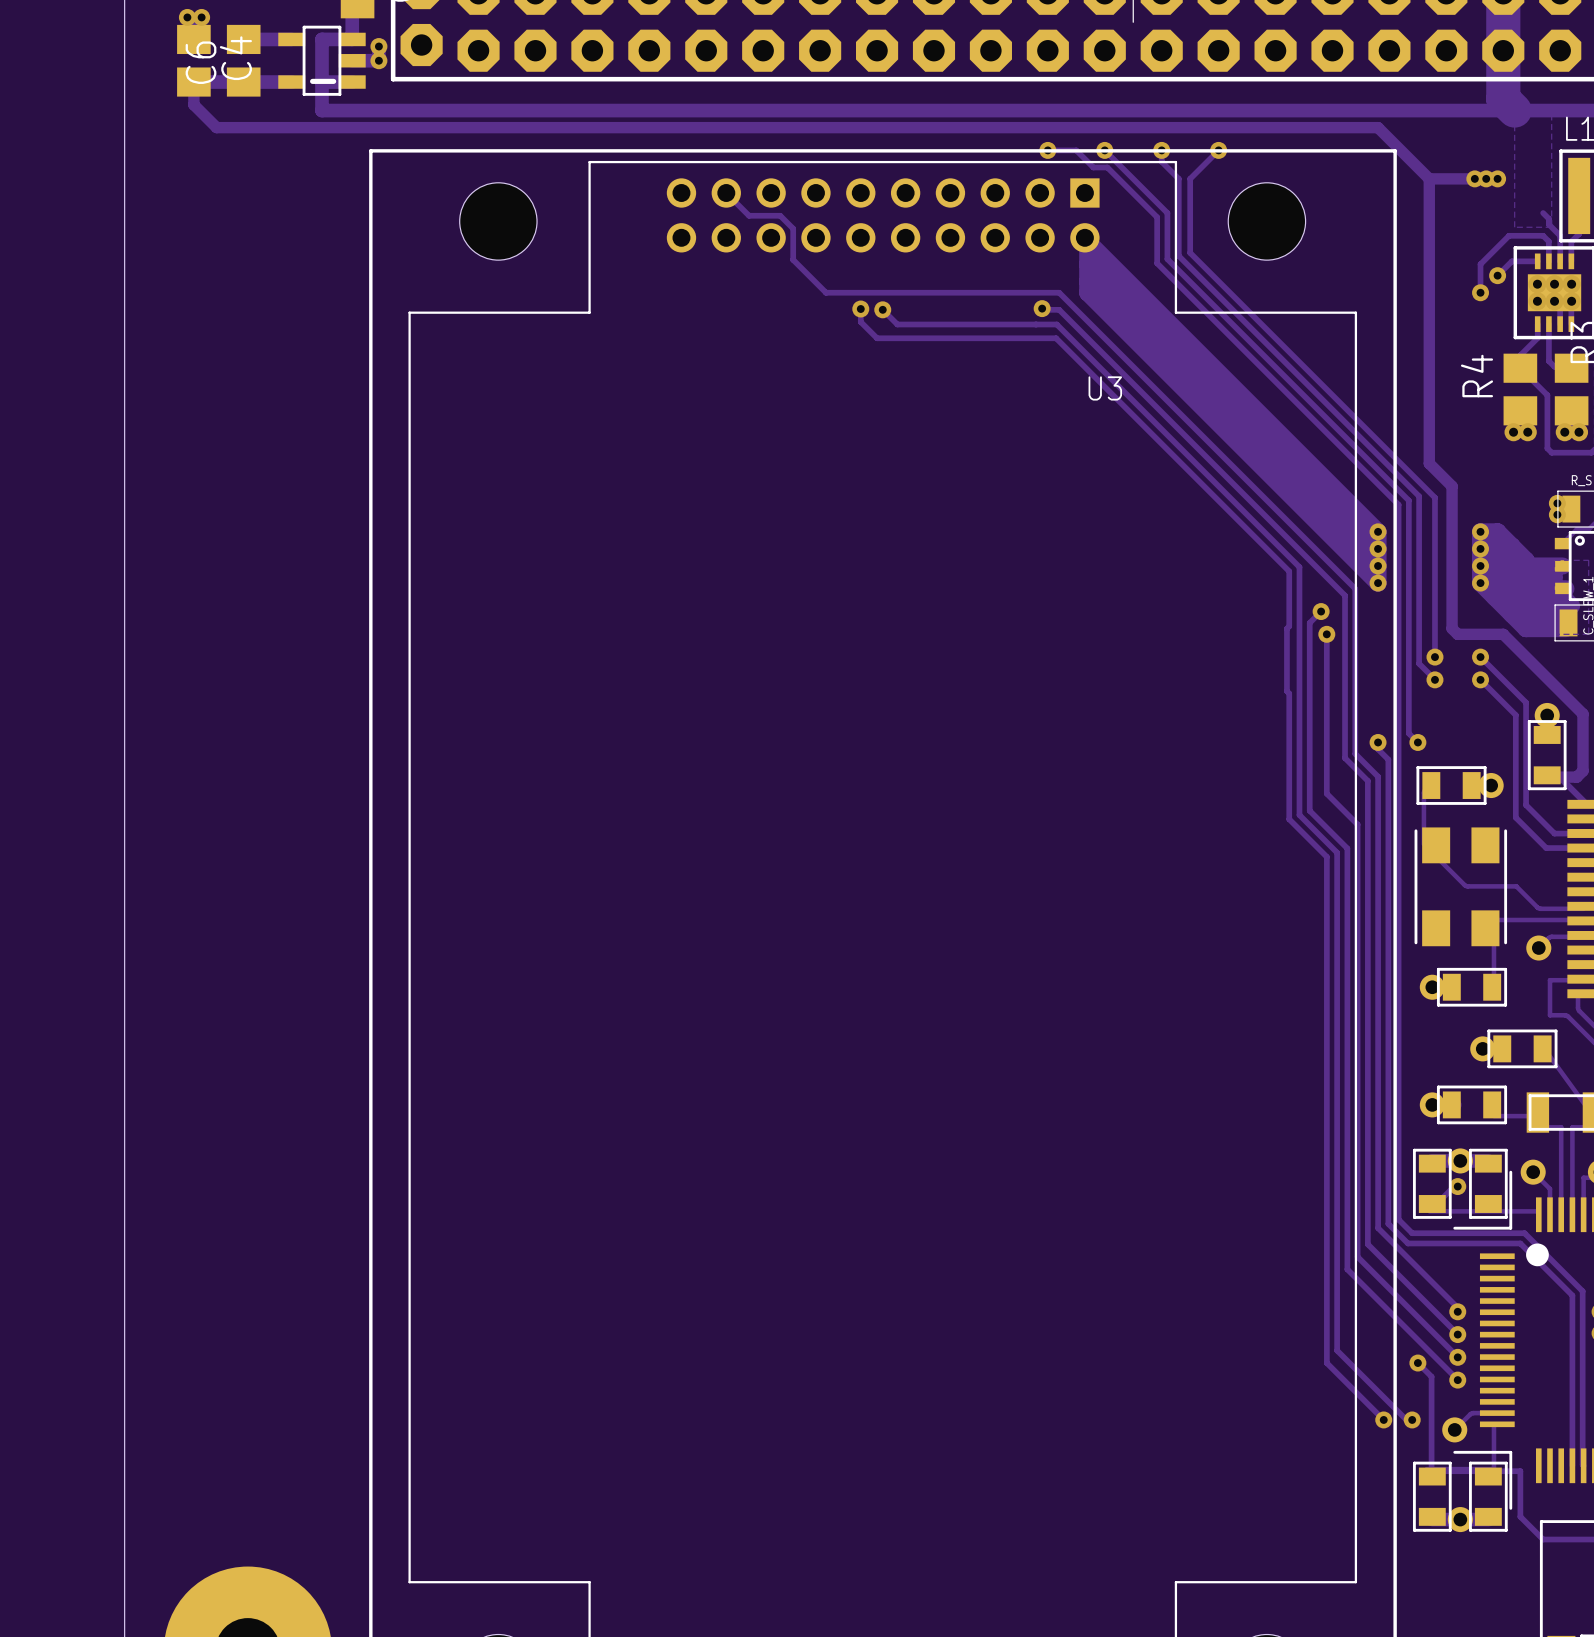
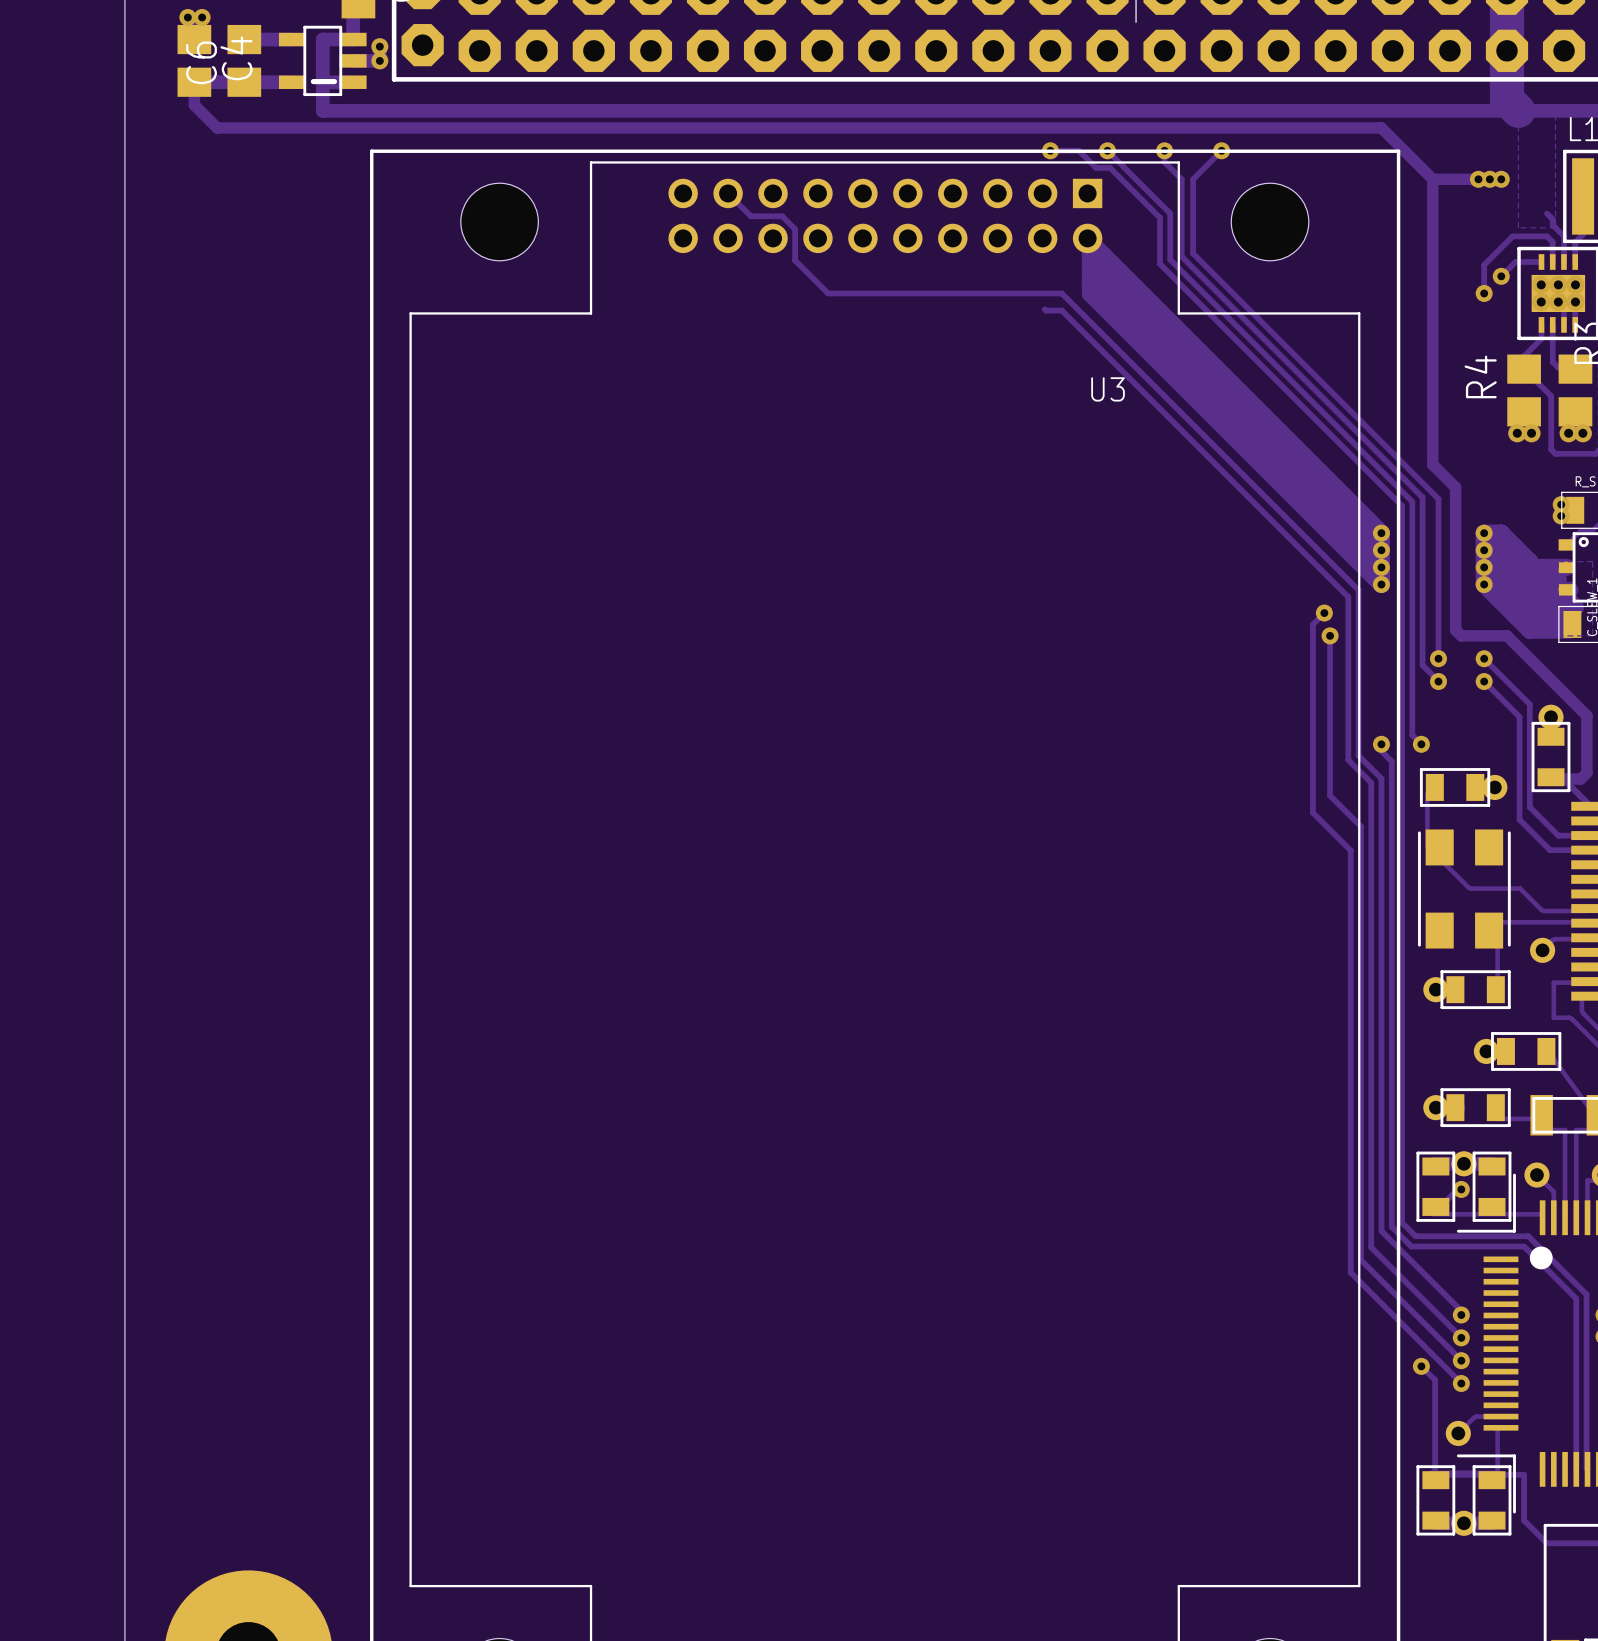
via: (1042, 308) -> none
track: (860, 309) (860, 322) (877, 338) (1056, 338) (1289, 571) (1289, 626) (1286, 628) (1286, 691) (1289, 693) (1289, 819) (1326, 856) (1326, 1363) (1383, 1419) -> none
via: (860, 309) -> none
track: (882, 309) (897, 324) (1056, 324) (1299, 567) (1299, 815) (1337, 852) (1337, 1350) (1406, 1419) (1412, 1419) -> none
via: (882, 309) -> none
via: (1383, 1419) -> none
via: (1412, 1419) -> none

